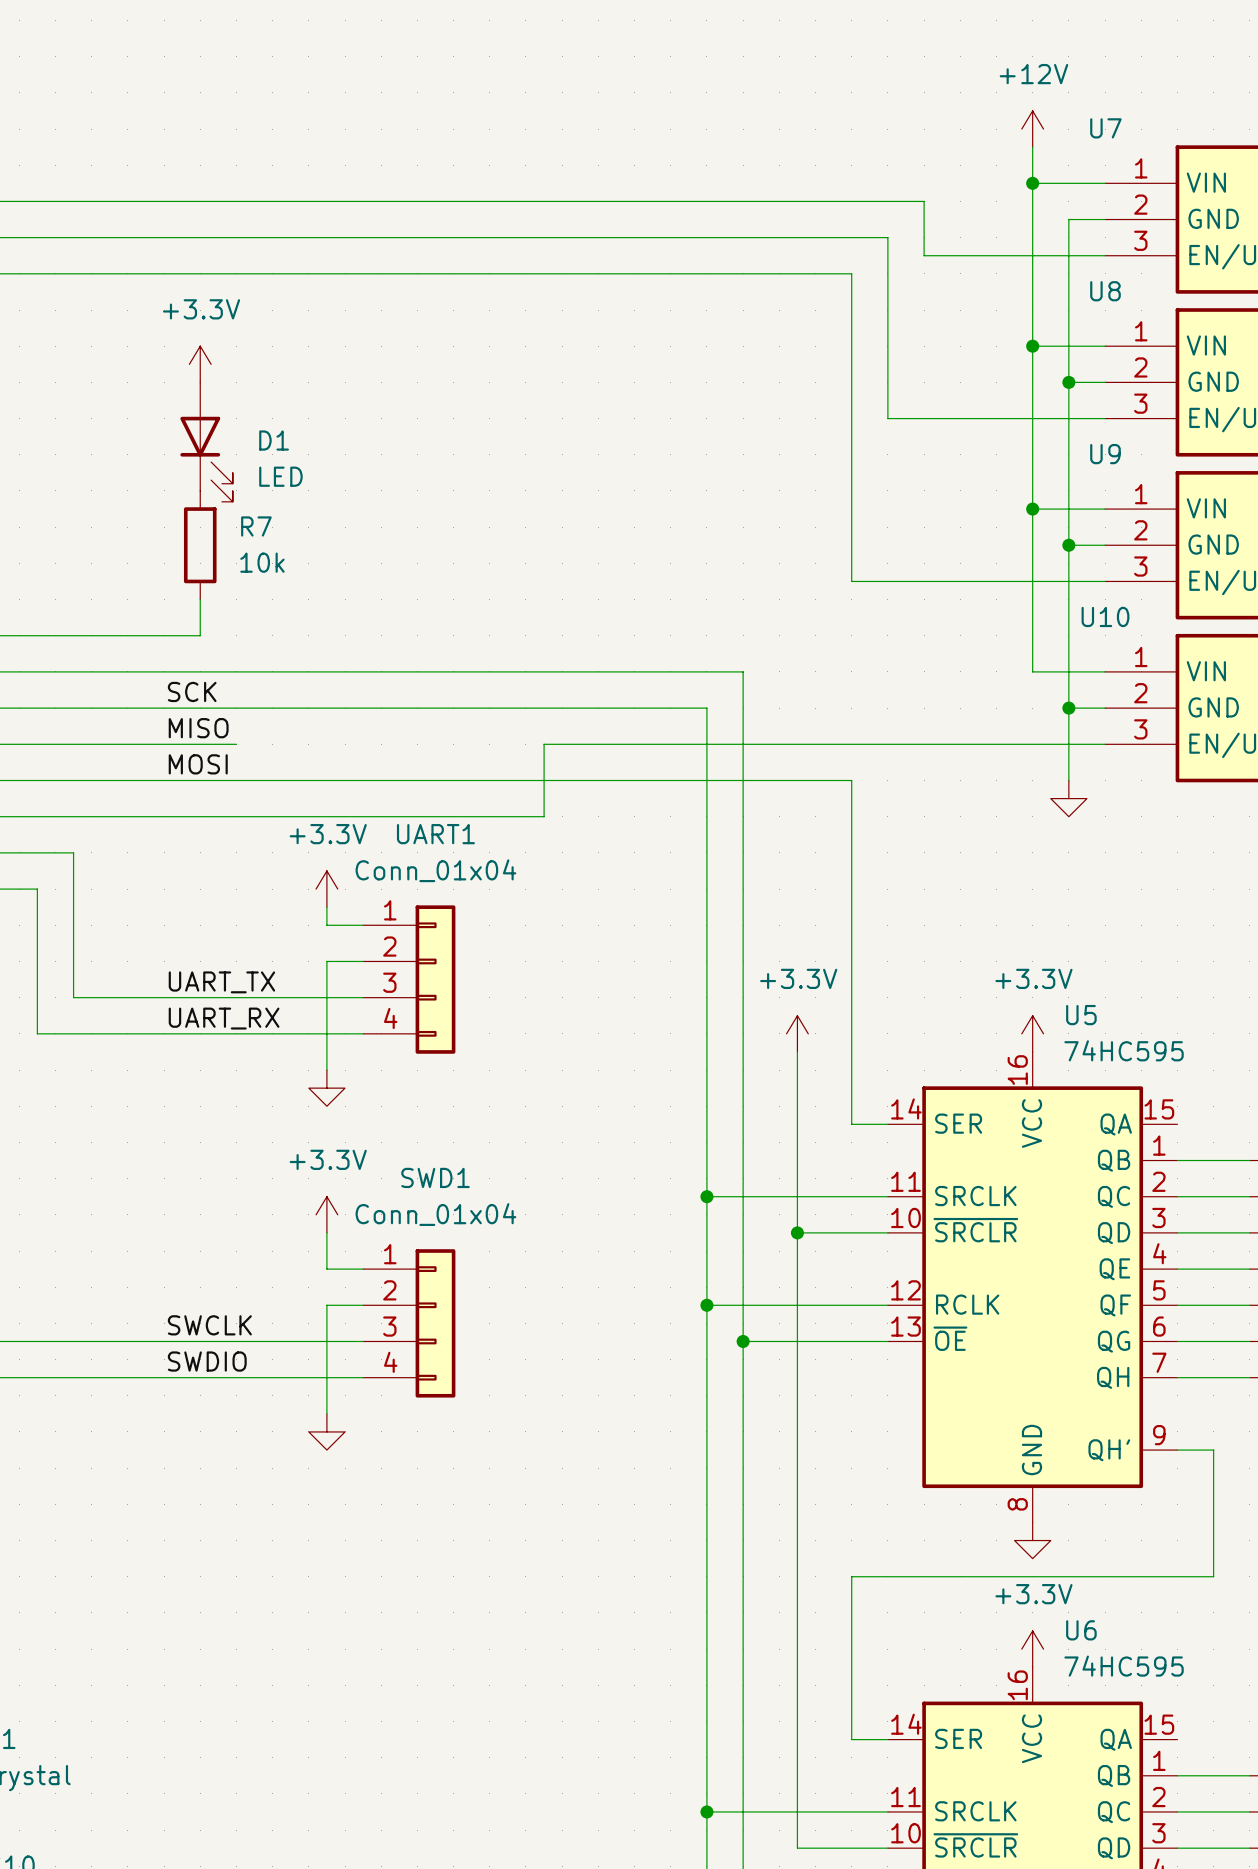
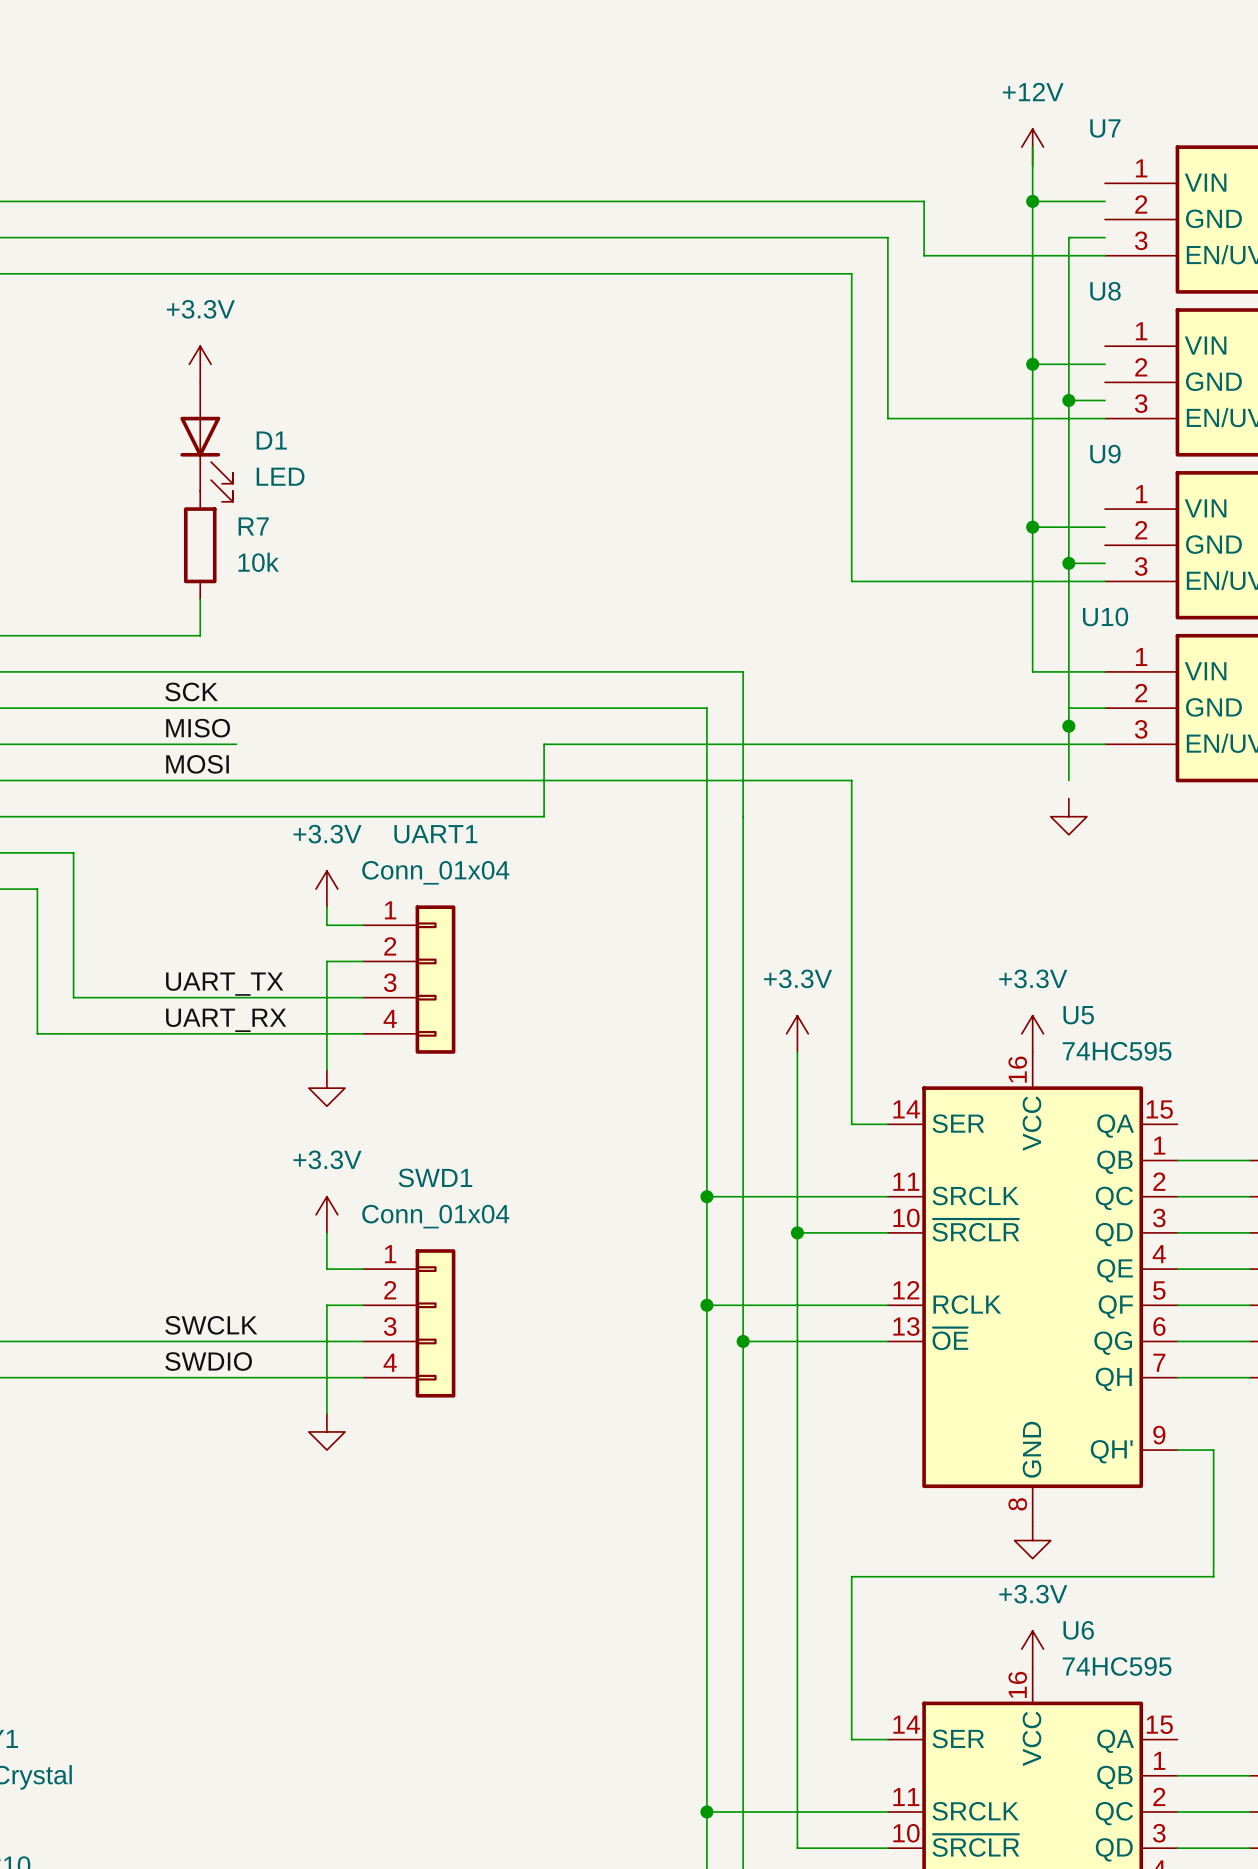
power symbol position: +12V (1032, 129) -> +12V (1032, 147)
wire: (1032, 183) (1105, 183) -> (1032, 201) (1105, 201)
junction position: (1032, 183) -> (1032, 201)
wire: (1105, 219) (1068, 219) (1068, 237) -> (1105, 237) (1068, 237)
wire: (1032, 346) (1105, 346) -> (1032, 364) (1105, 364)
junction position: (1032, 346) -> (1032, 364)
wire: (1068, 382) (1105, 382) -> (1068, 400) (1105, 400)
junction position: (1068, 382) -> (1068, 400)
wire: (1032, 509) (1105, 509) -> (1032, 527) (1105, 527)
junction position: (1032, 509) -> (1032, 527)
wire: (1068, 545) (1105, 545) -> (1068, 563) (1105, 563)
junction position: (1068, 545) -> (1068, 563)
junction position: (1068, 708) -> (1068, 726)
power symbol position: (1068, 798) -> (1068, 816)

